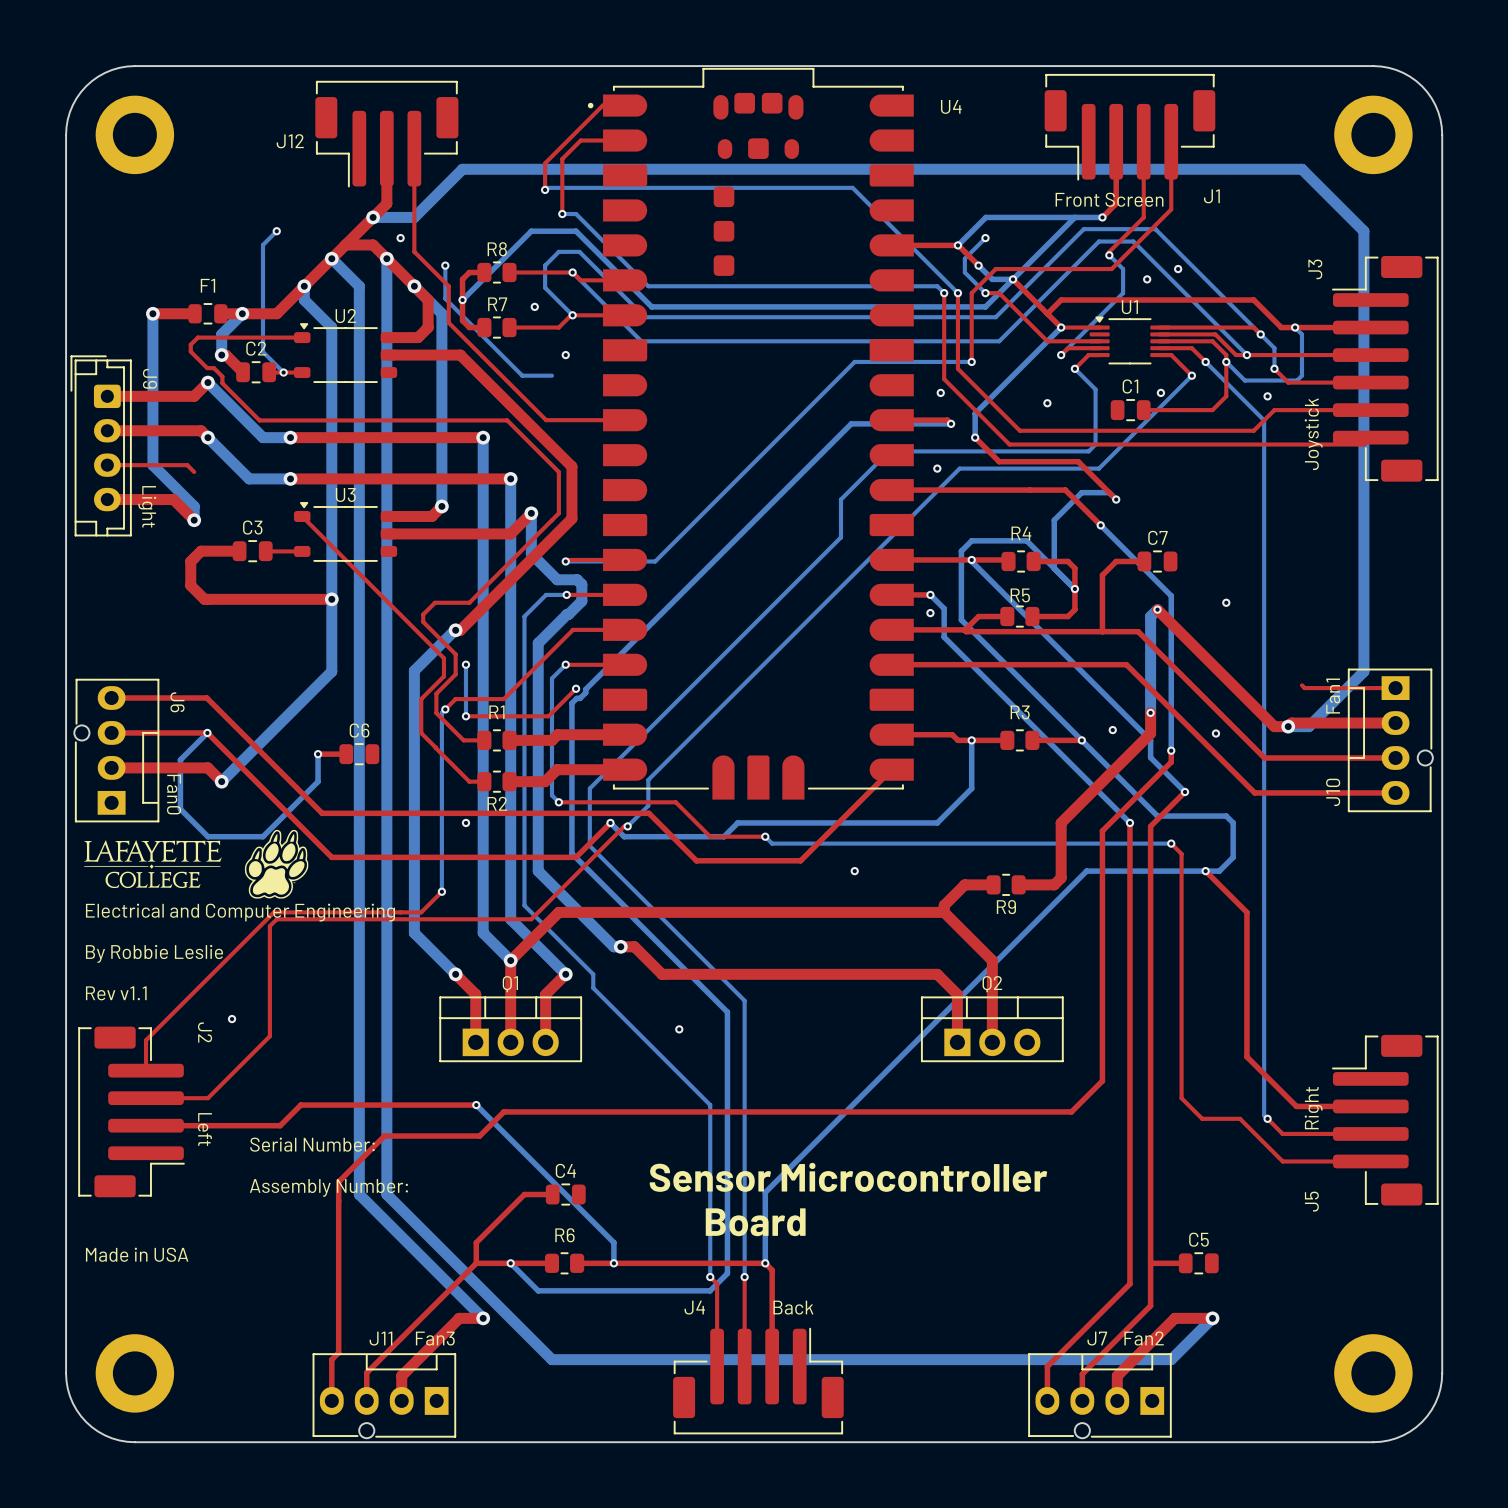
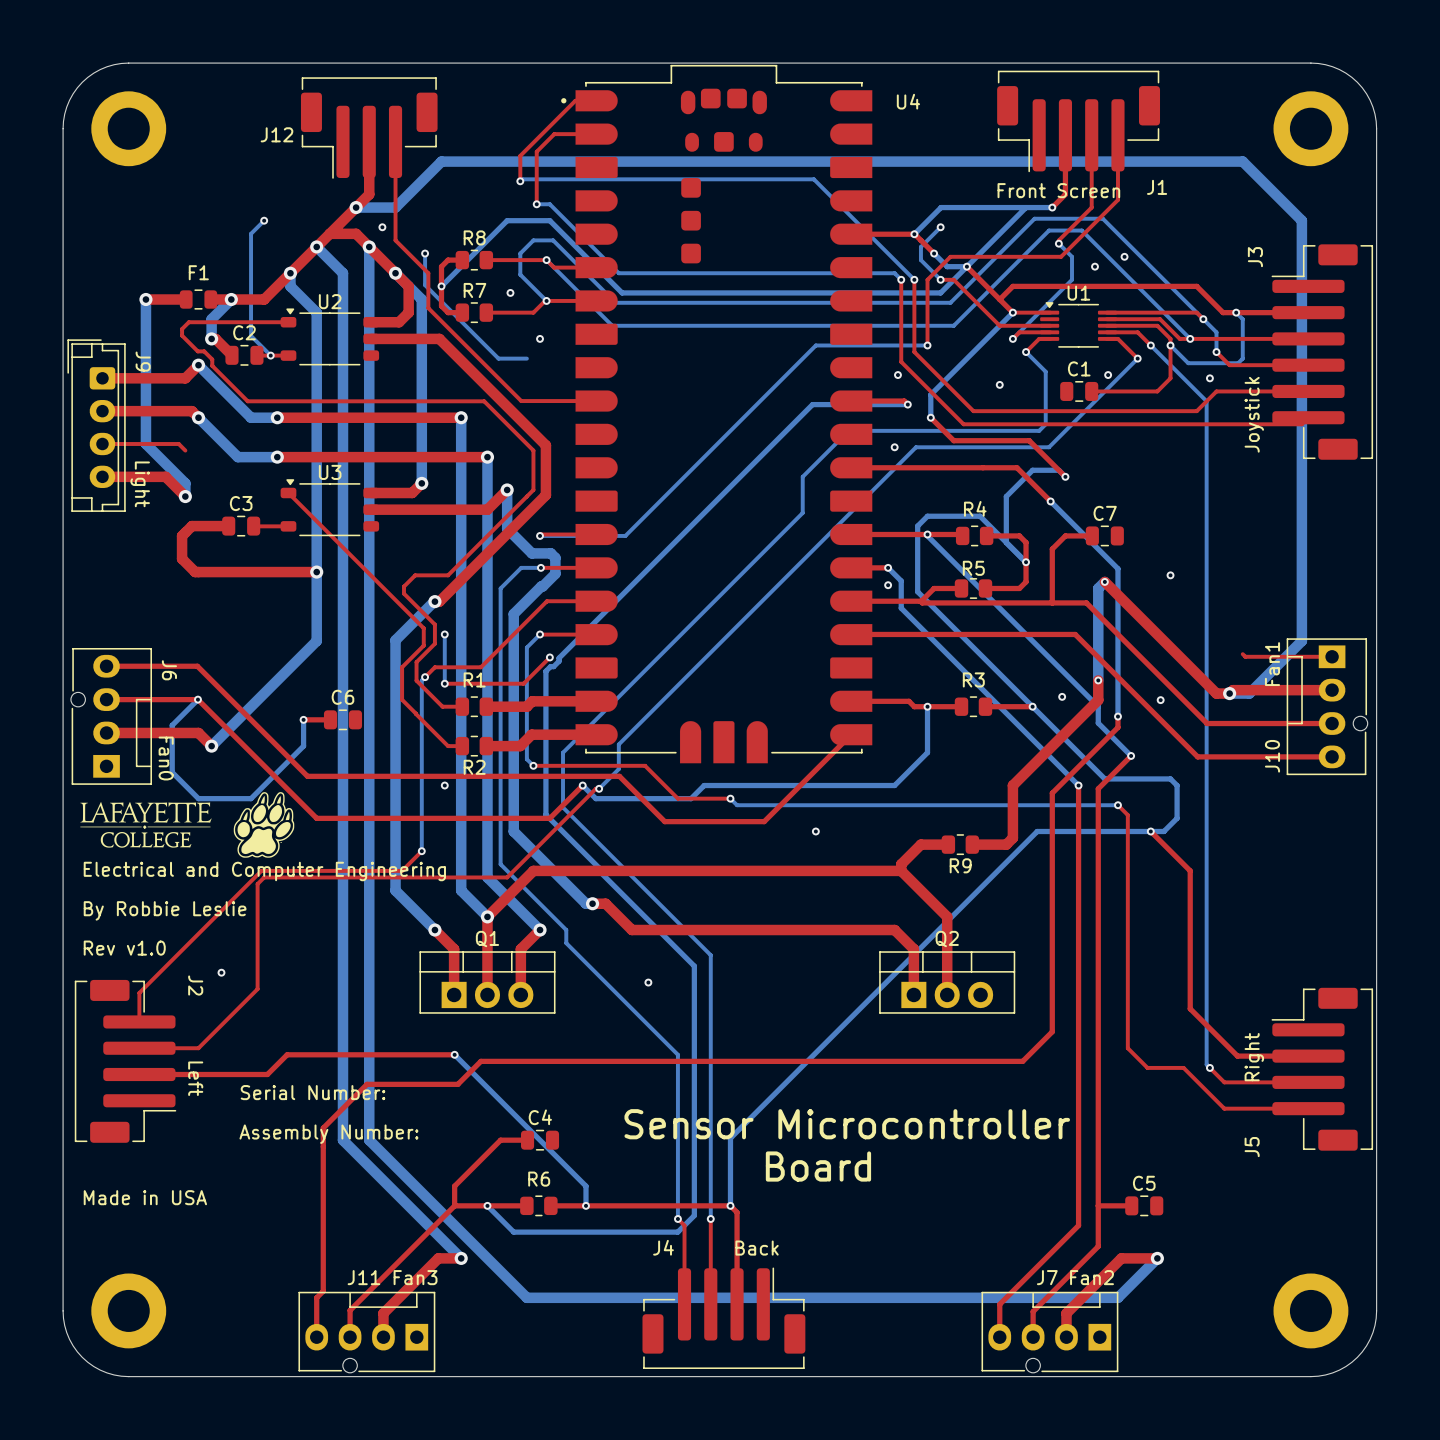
text: Rev v1.1 (116, 993) -> Rev v1.0 (124, 948)

